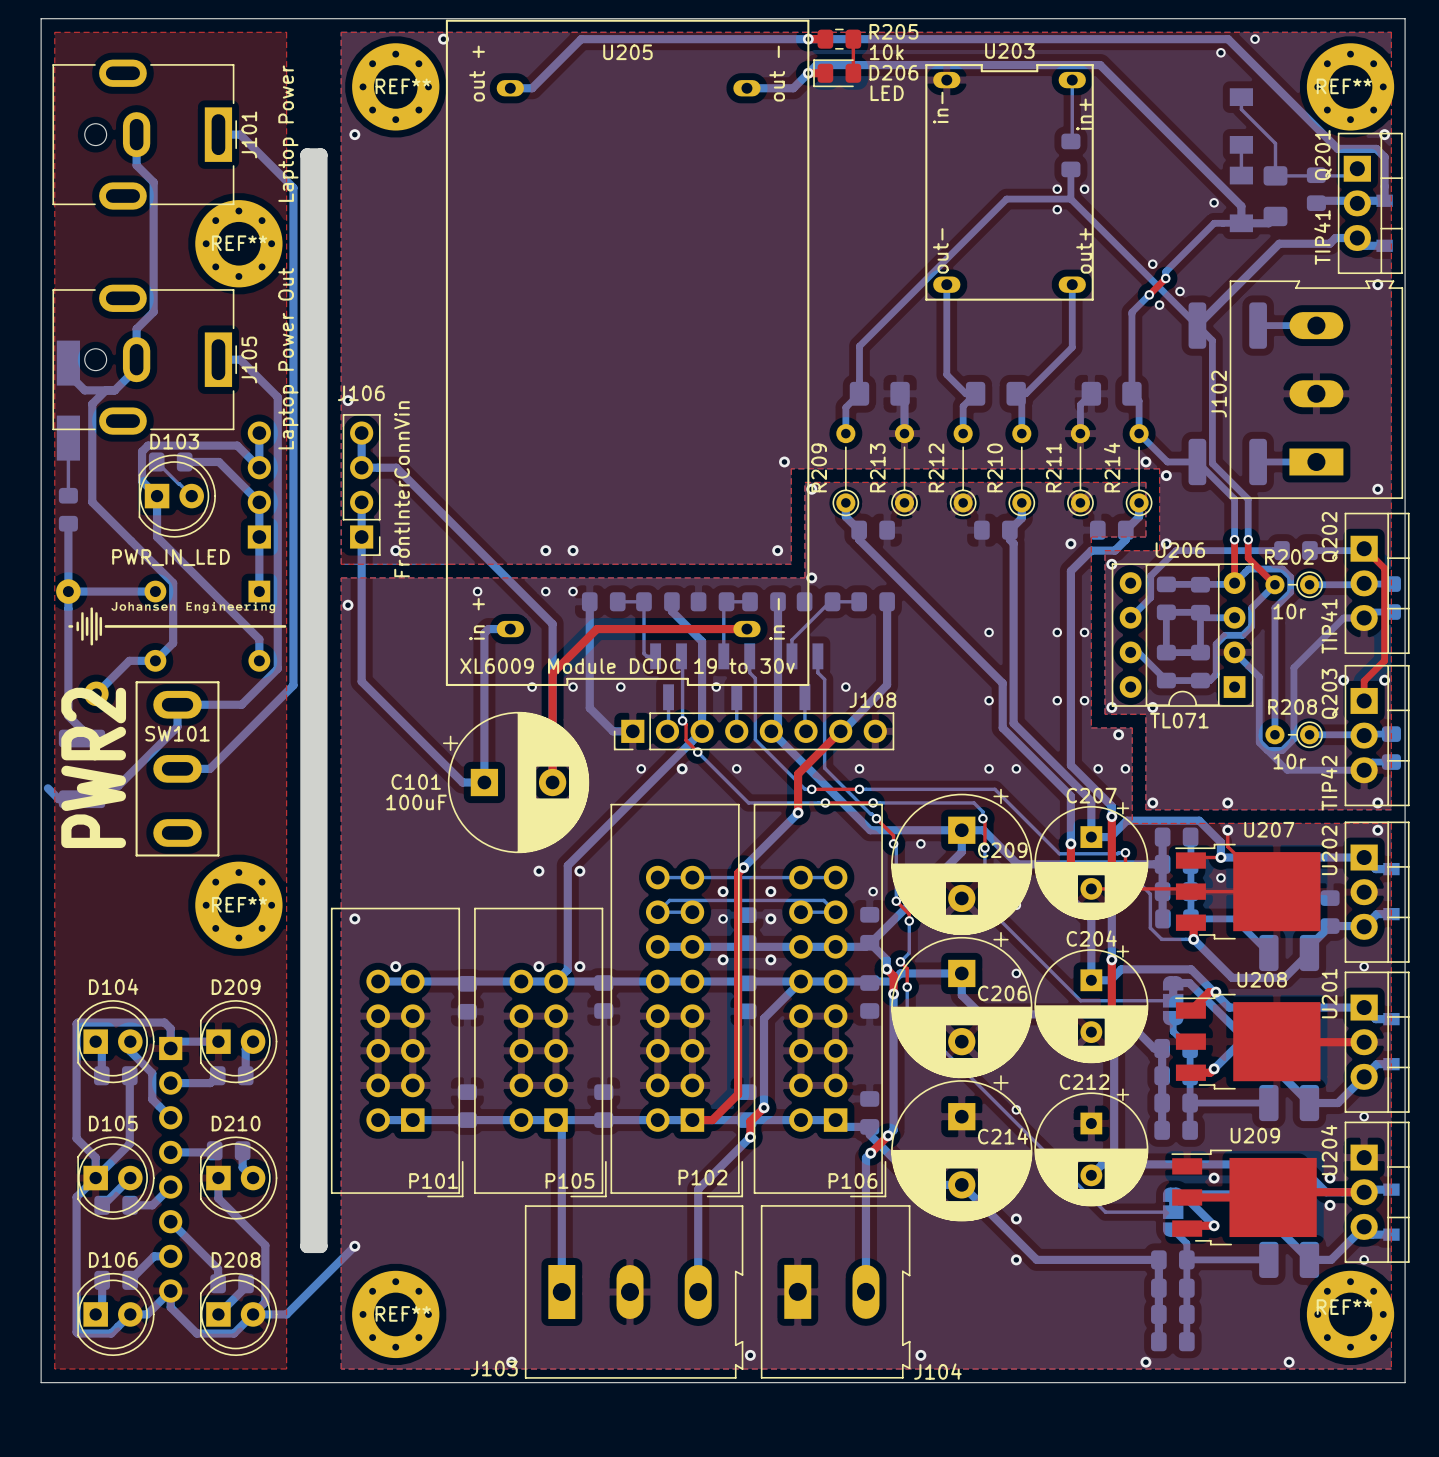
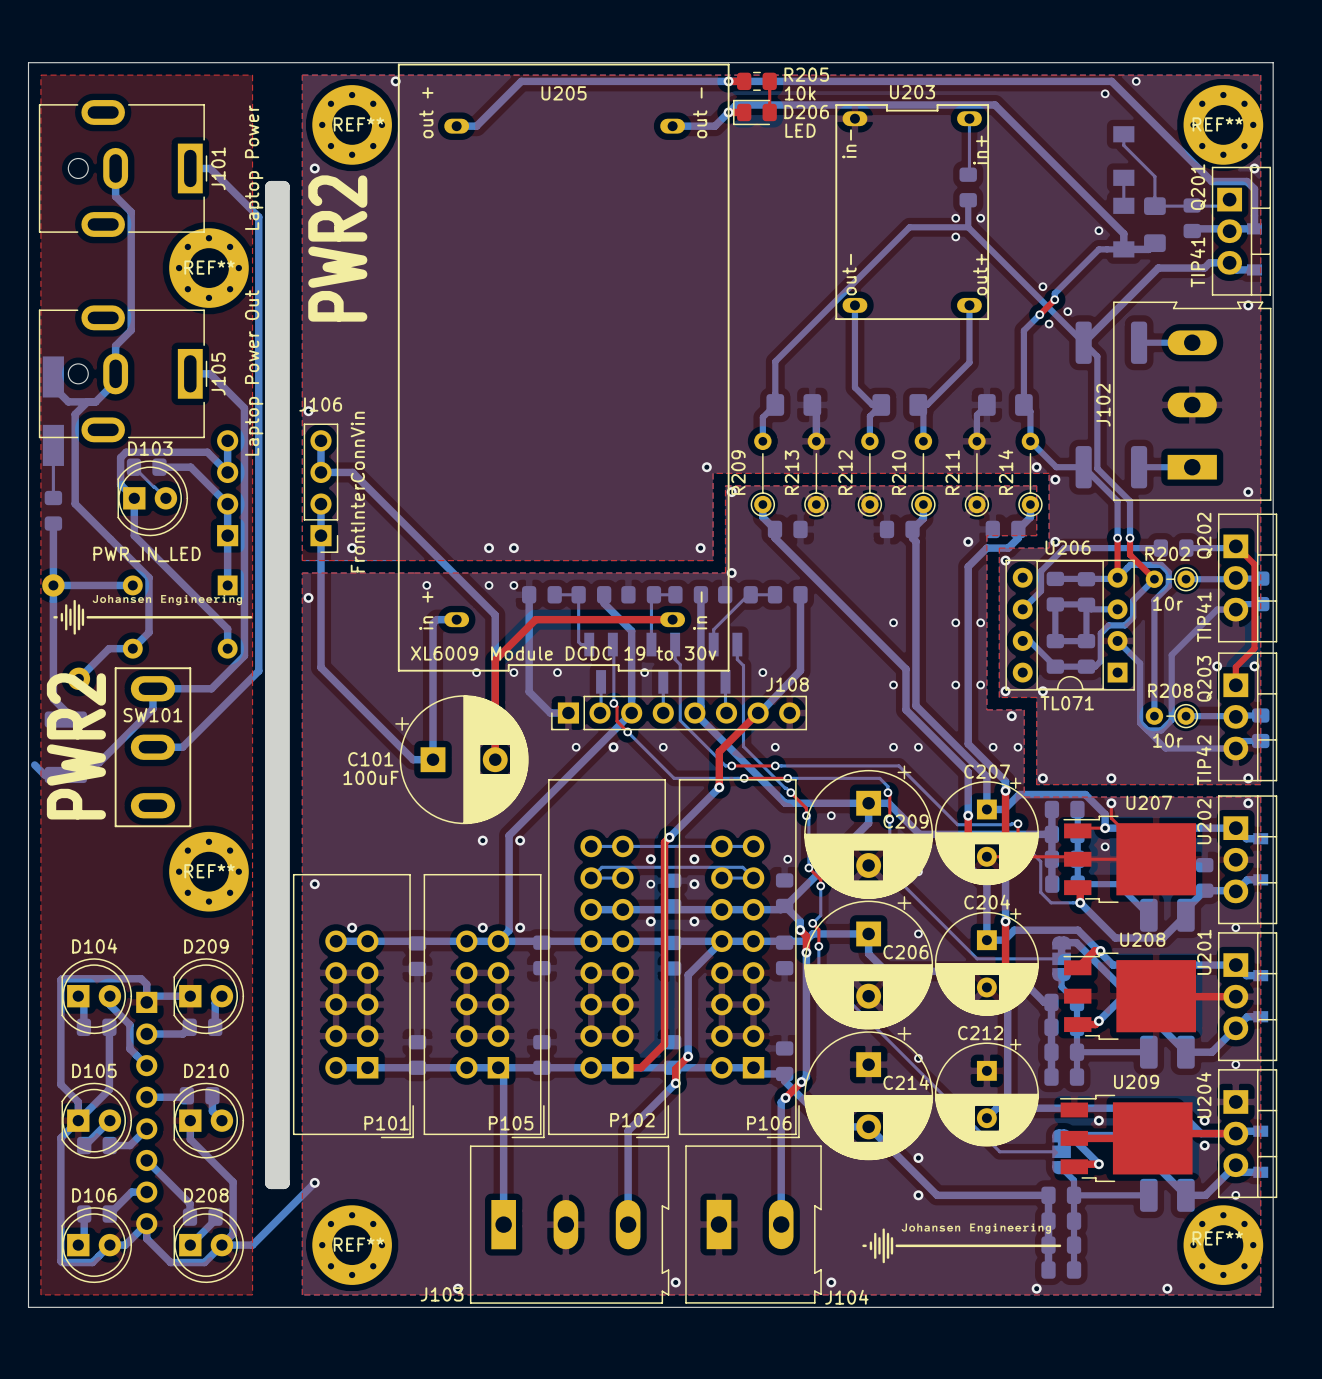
text: none -> PWR2 (337, 248)
drawing: none -> [862, 1223, 1062, 1264]

